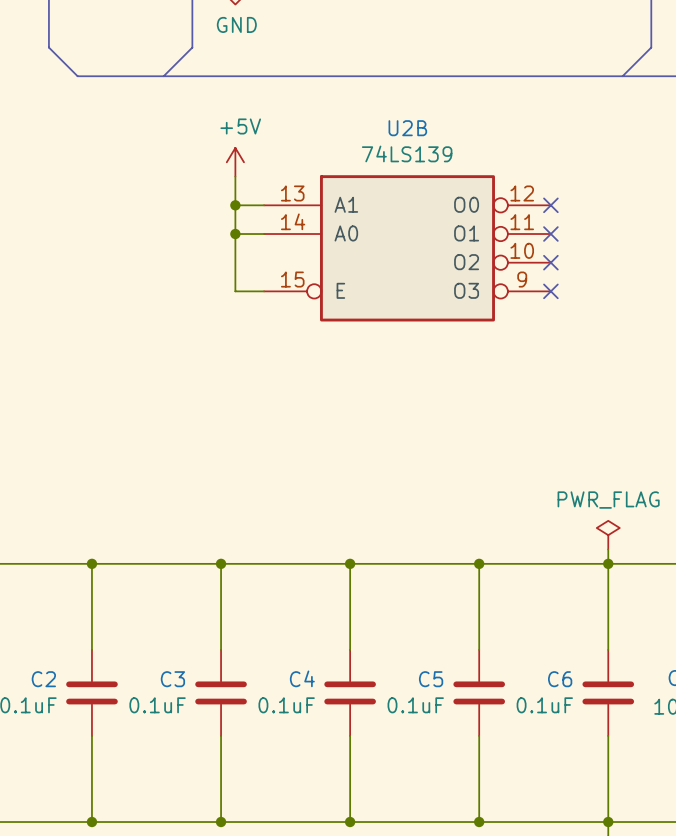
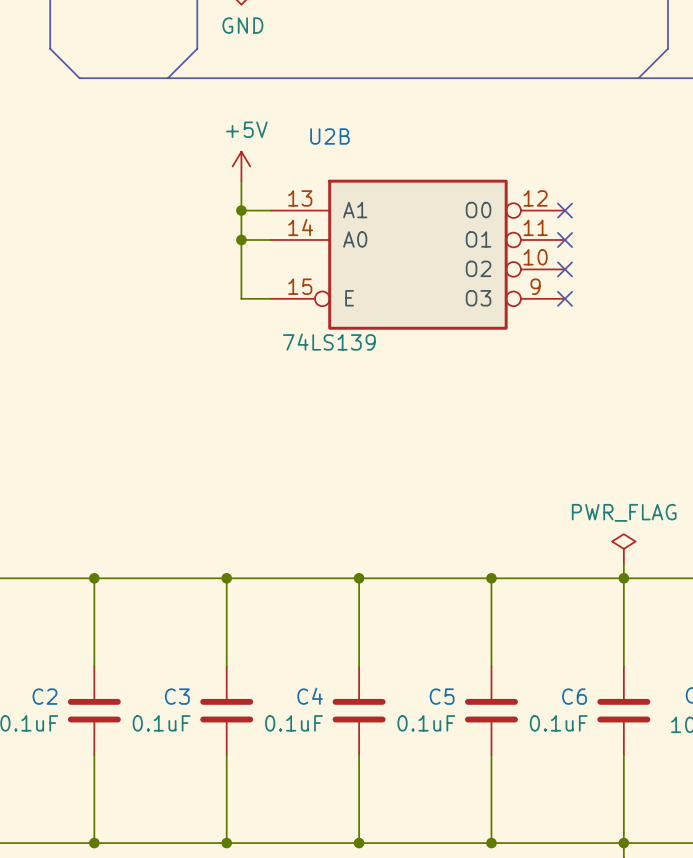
U2B name position: U2B (407, 128) -> U2B (330, 136)
U2B value position: 74LS139 (407, 153) -> 74LS139 (329, 342)

